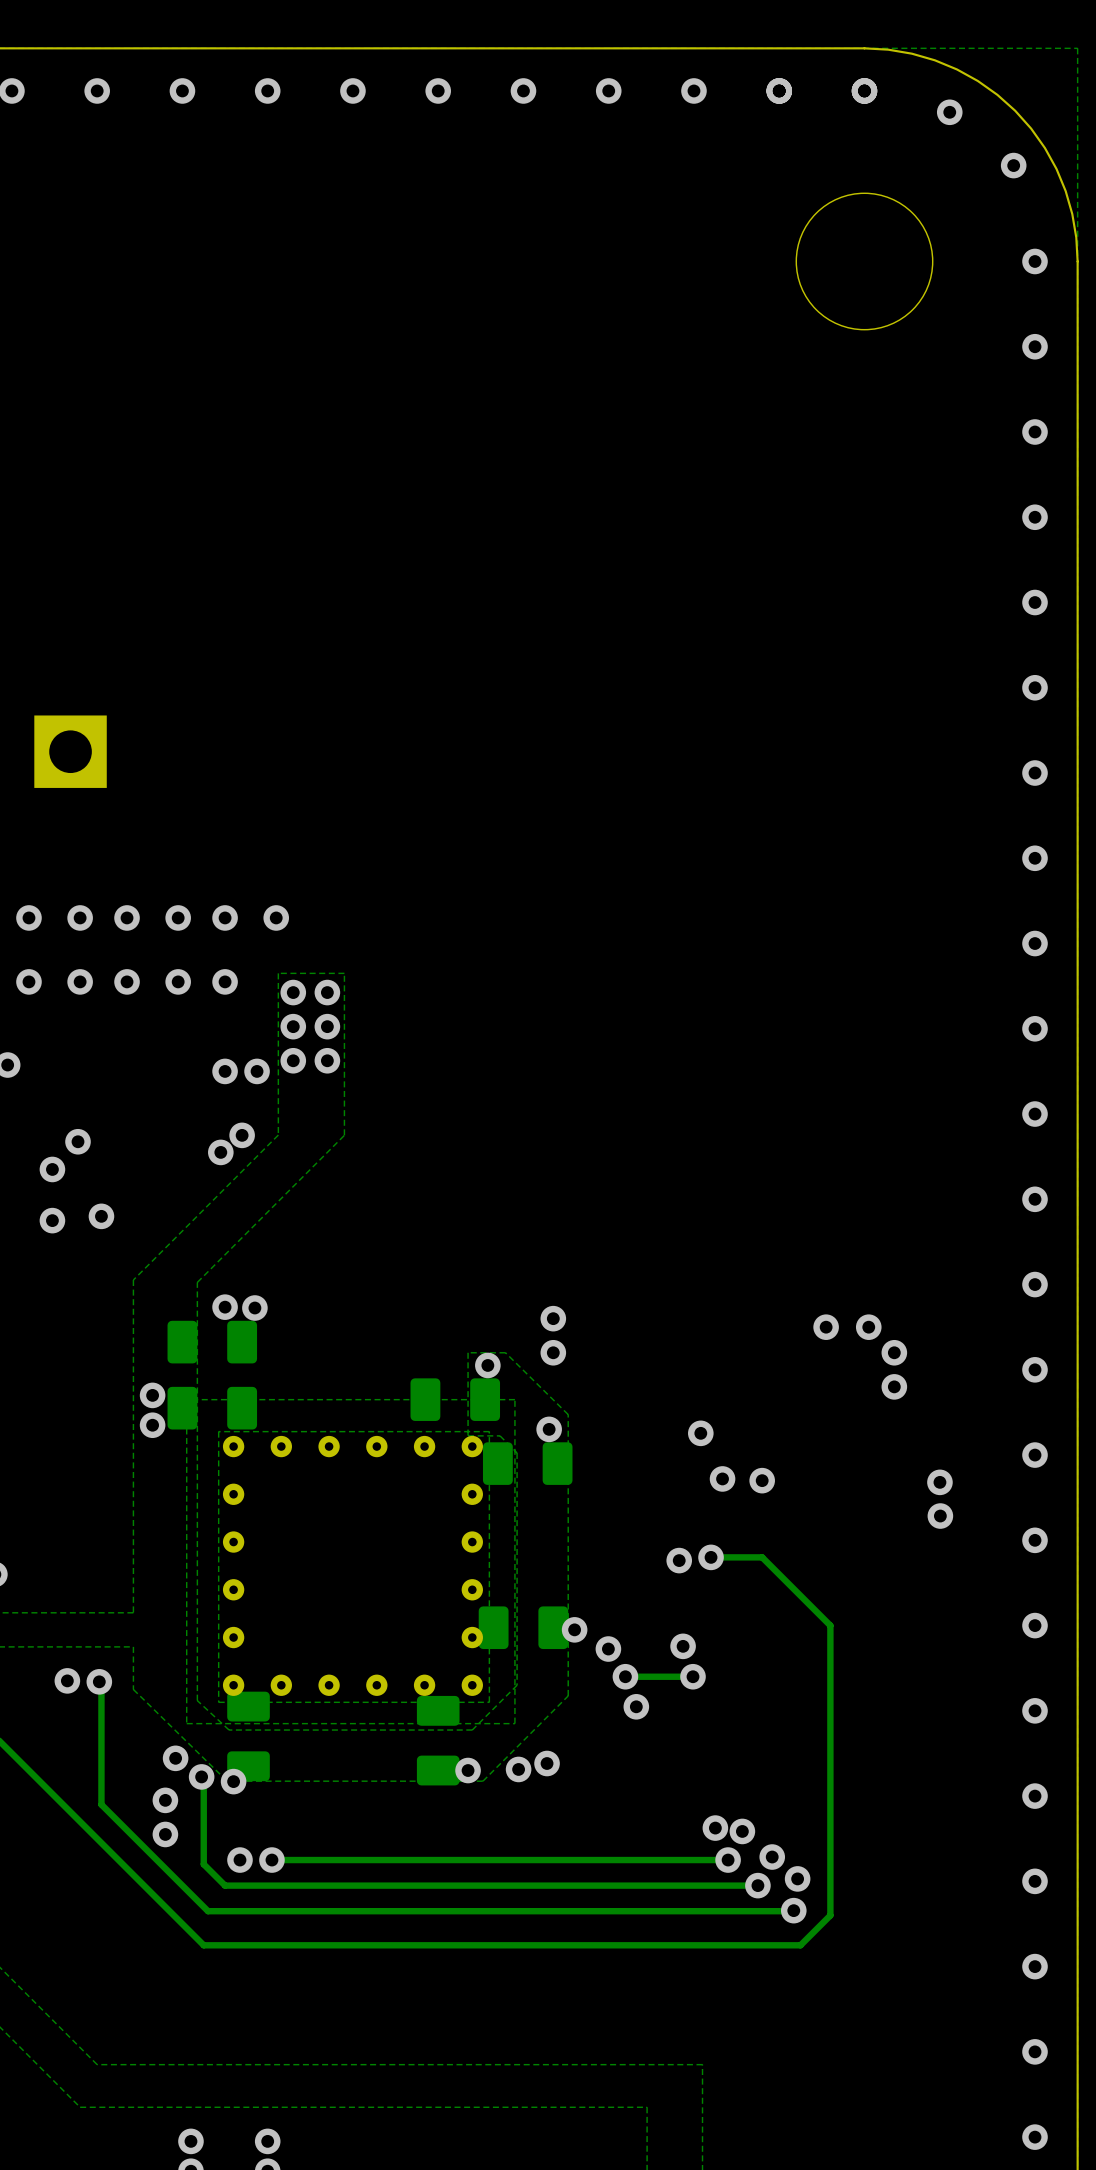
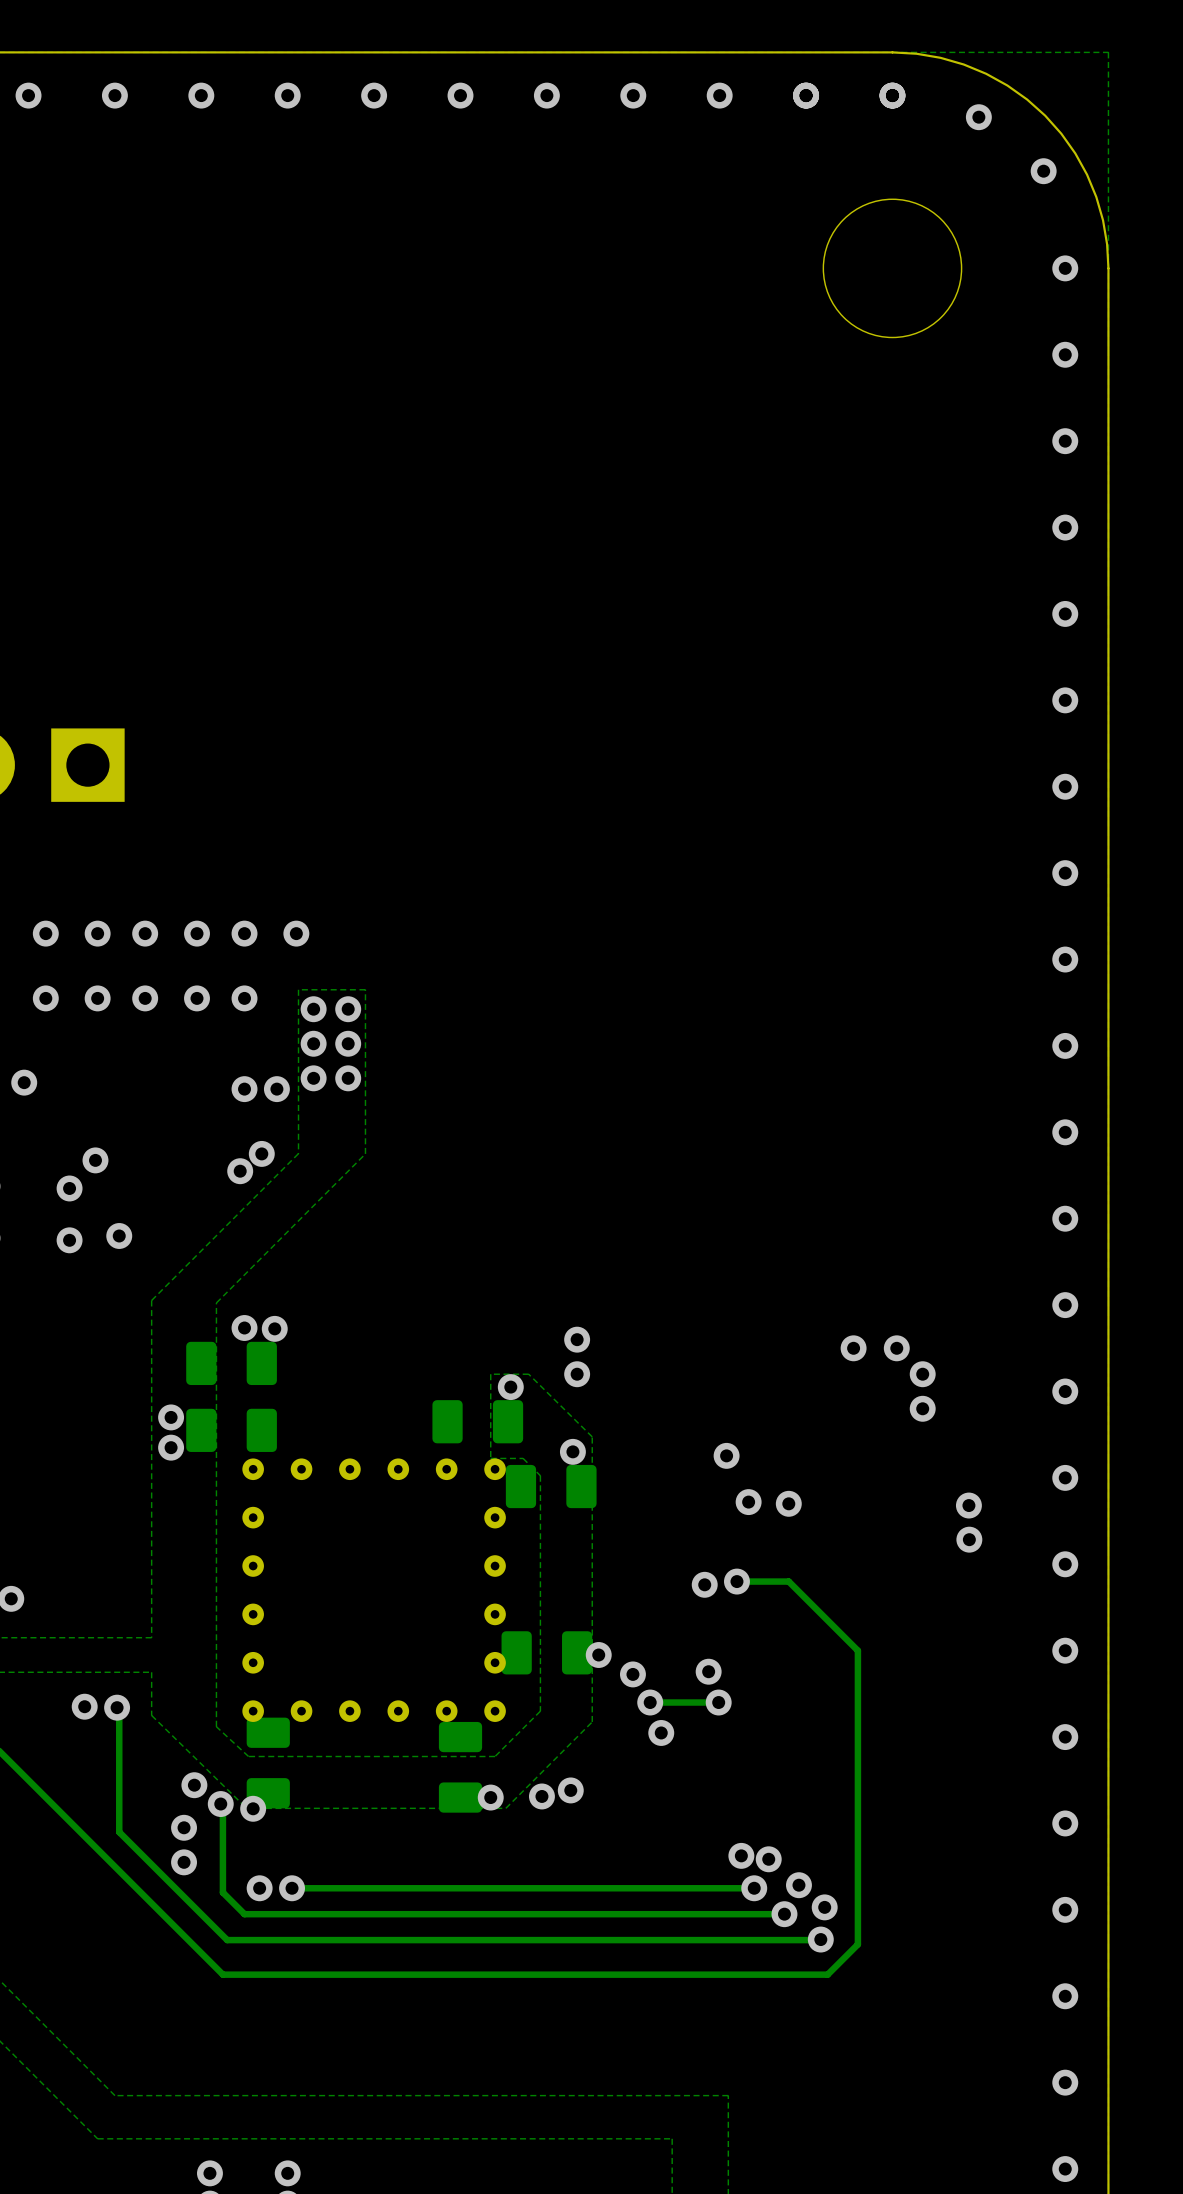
zone outline: (514, 1399) (186, 1399) (186, 1723) (514, 1723) (514, 1399) -> none
zone outline: (489, 1431) (218, 1431) (218, 1702) (489, 1702) (489, 1431) -> none

